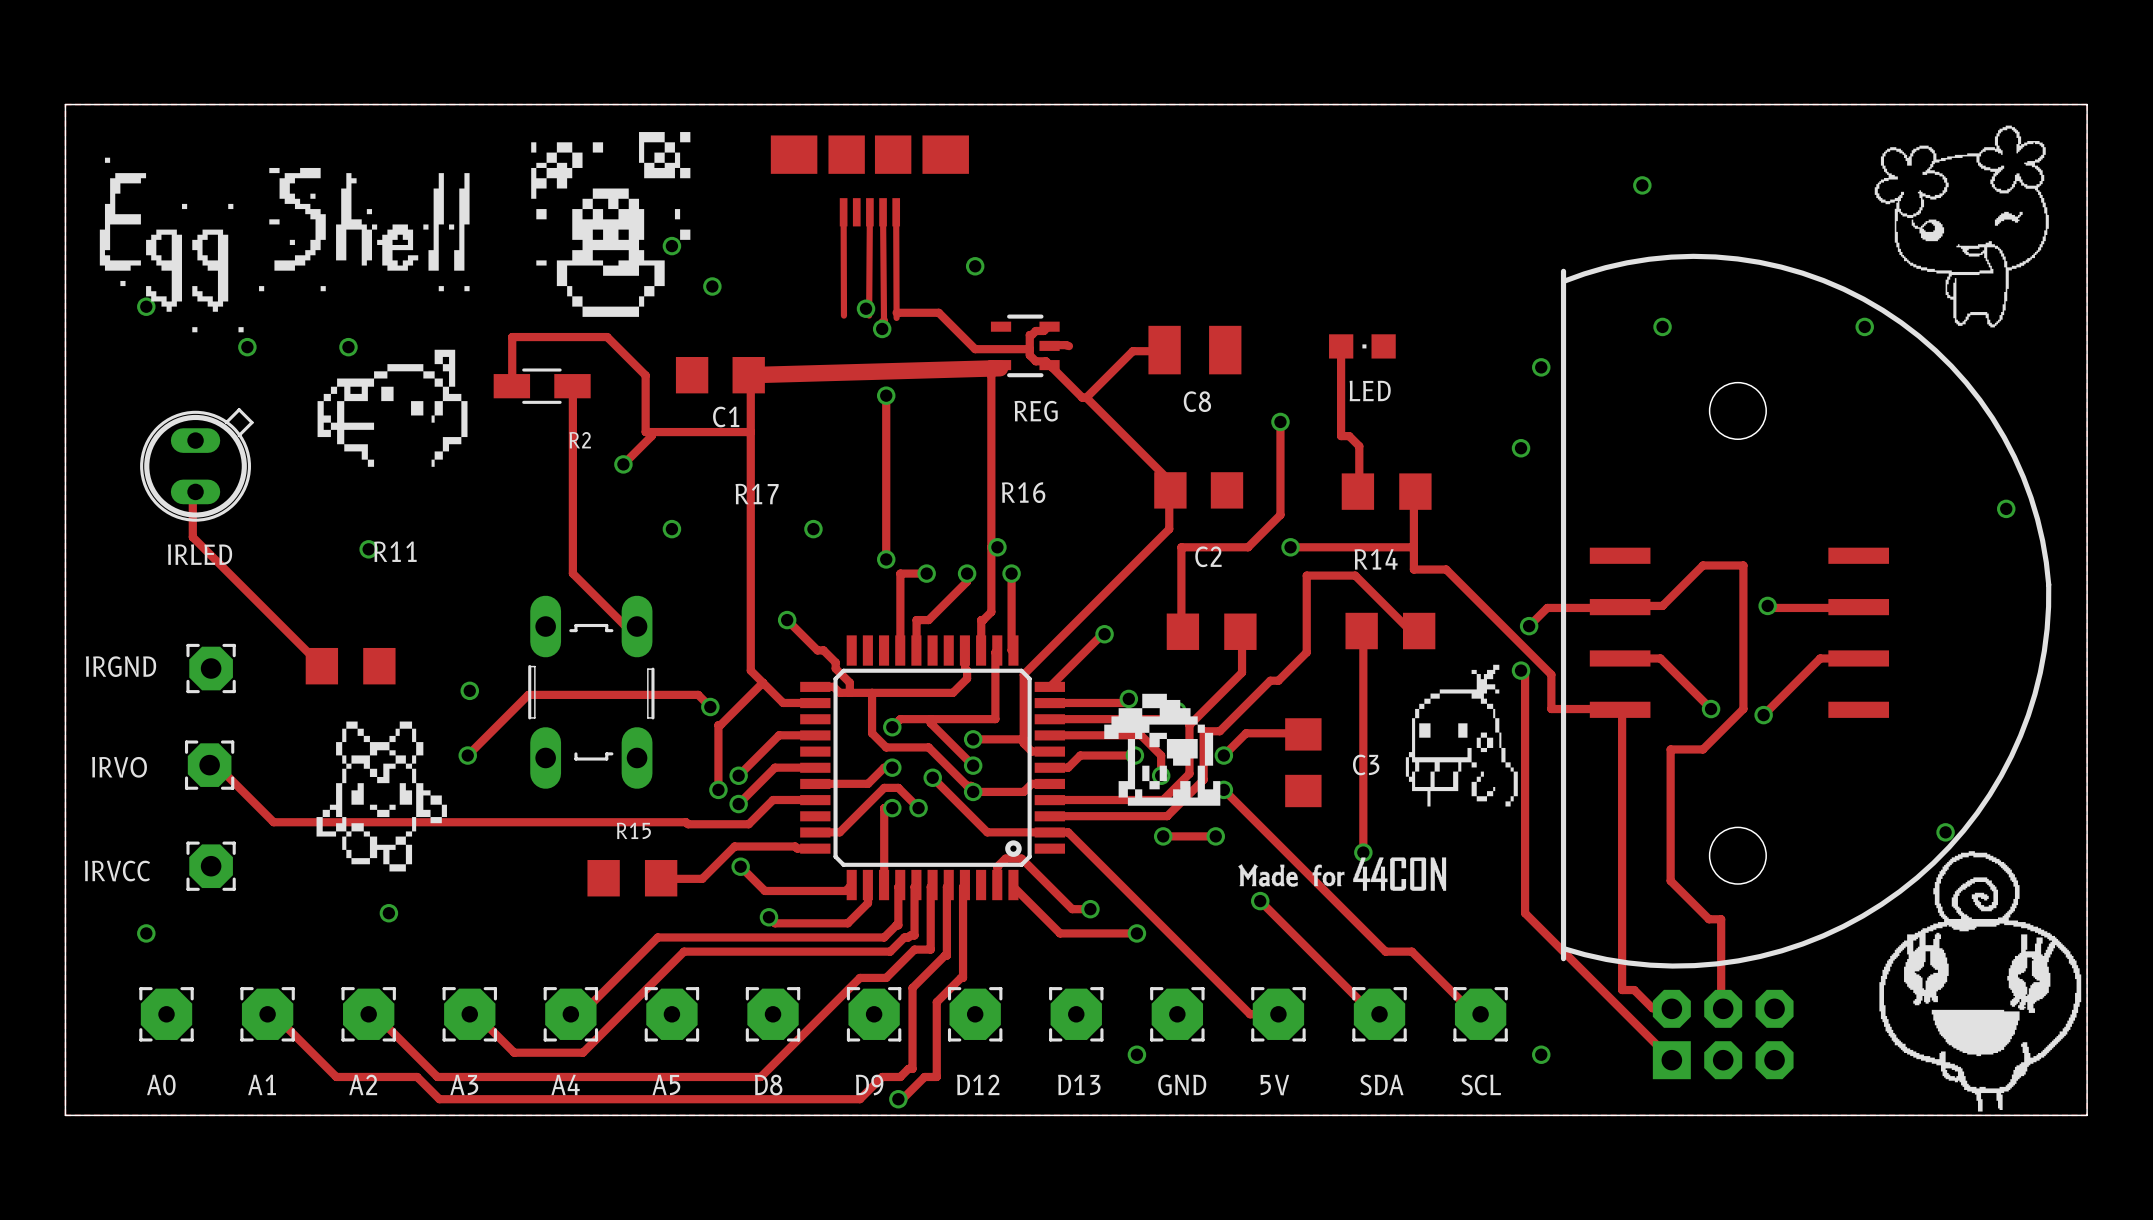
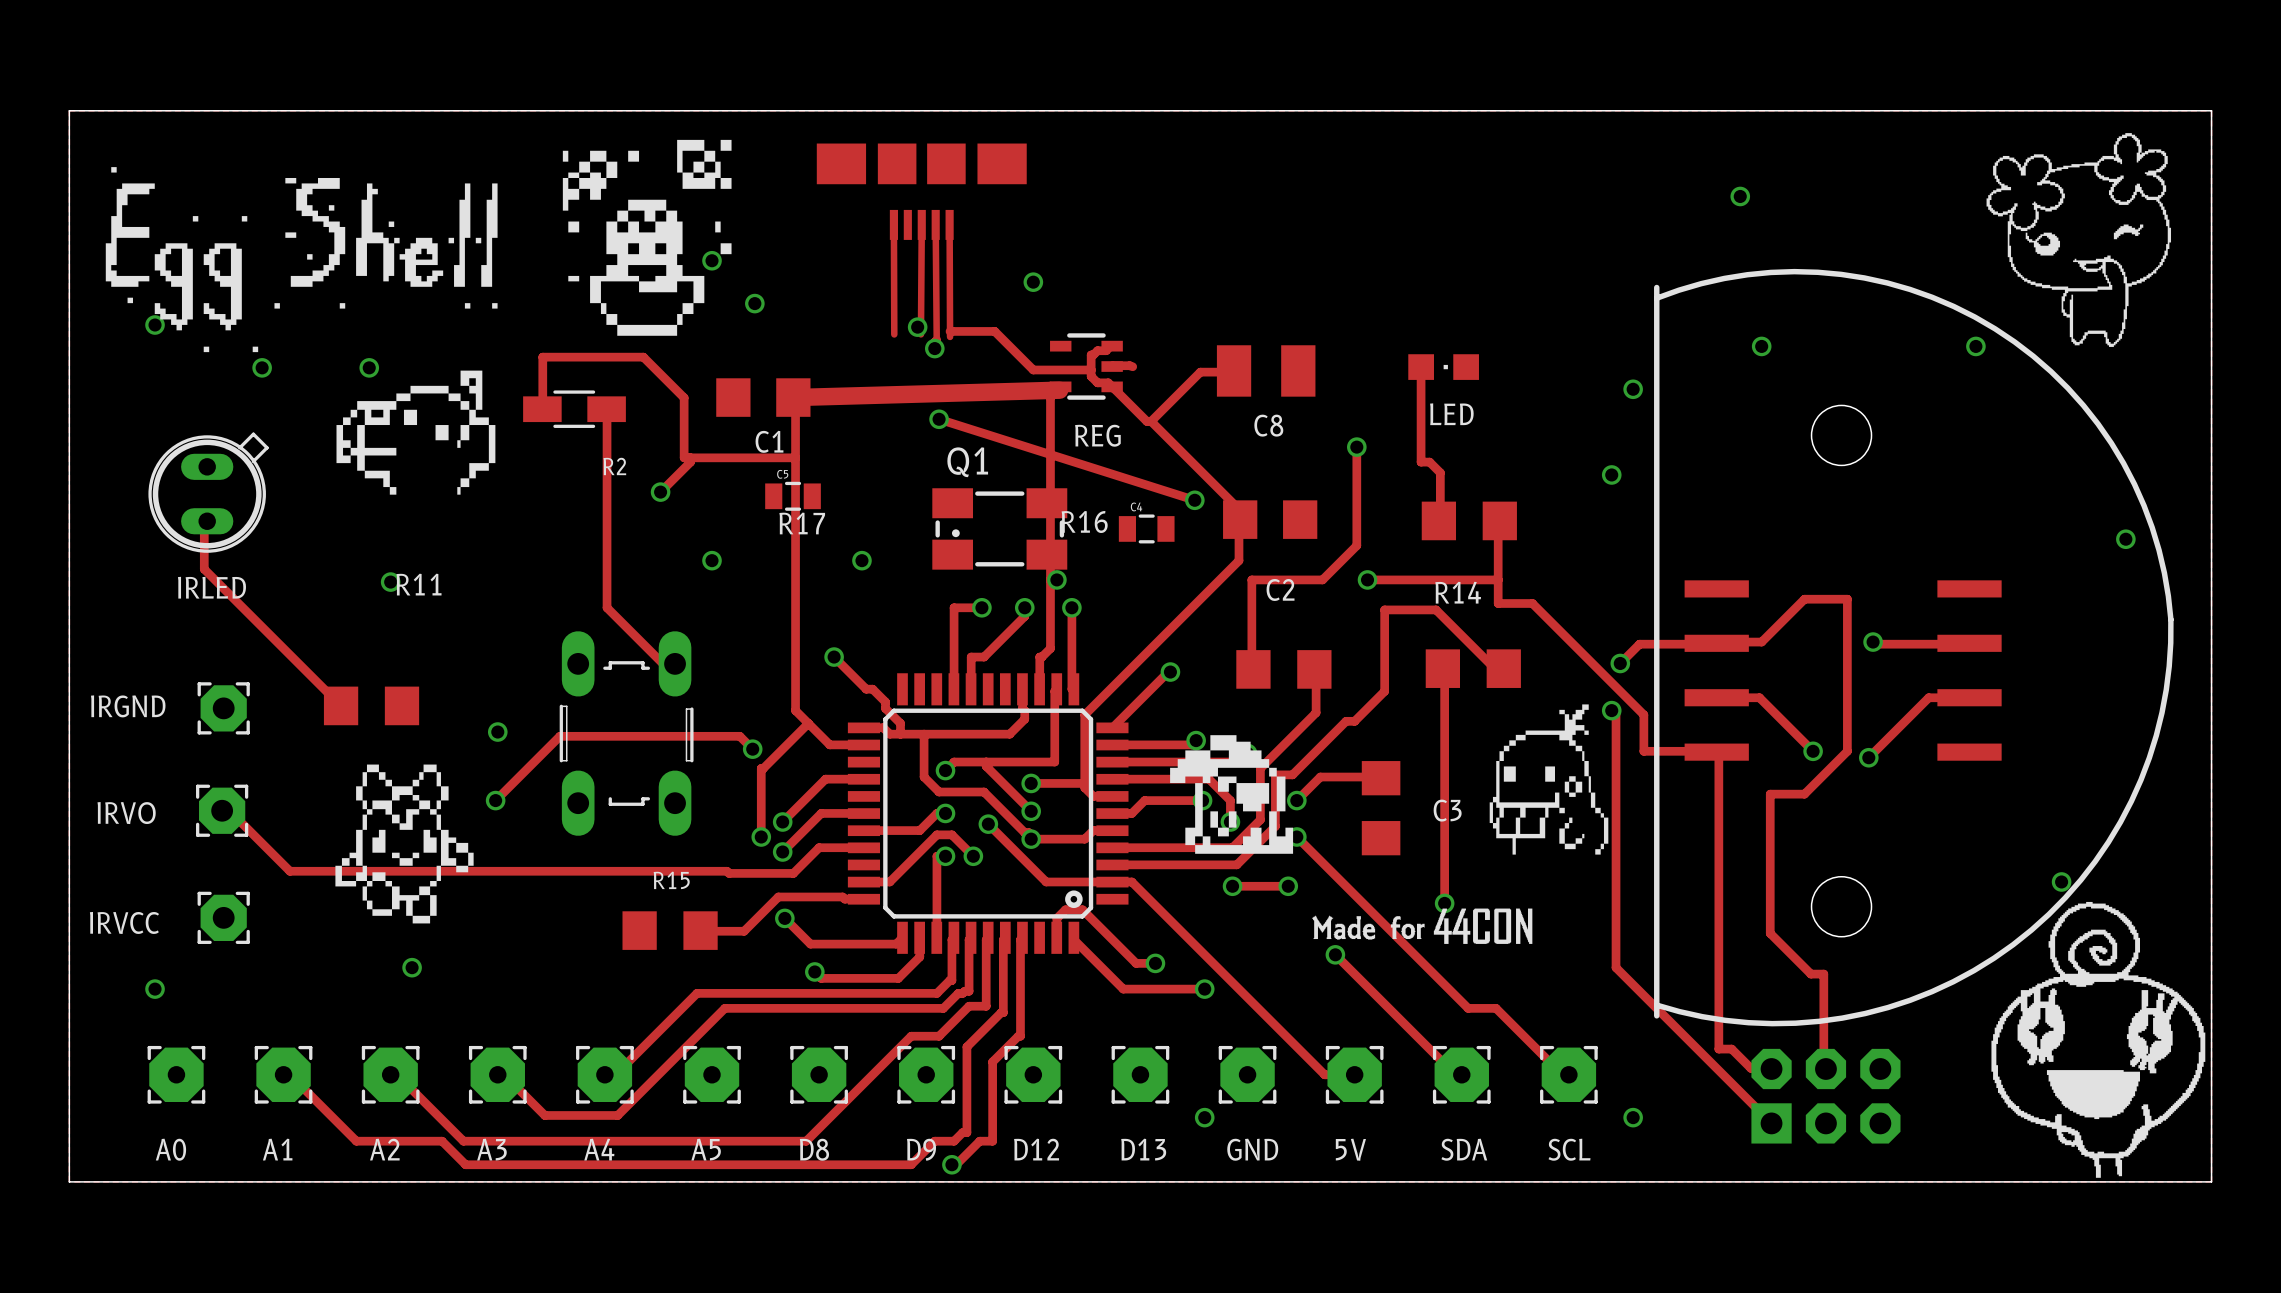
track: (886, 395) (886, 559) -> (939, 419) (1194, 500)
C5: none -> (793, 496)
via: none -> (1194, 500)
Q1: none -> (999, 528)
C4: none -> (1146, 528)
via: (886, 559) -> none

